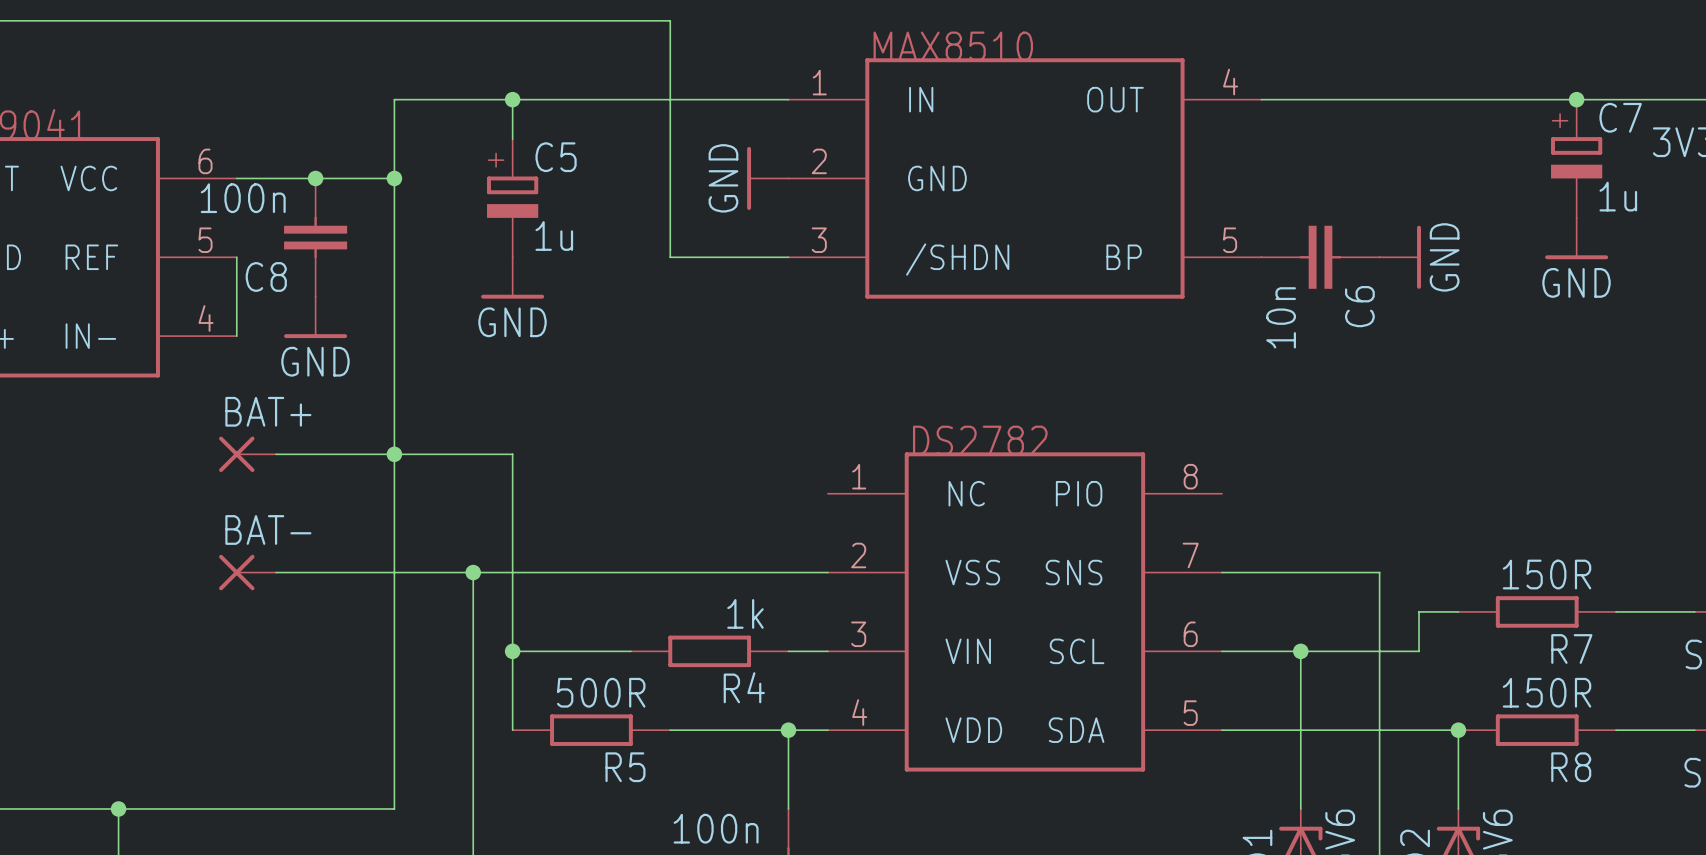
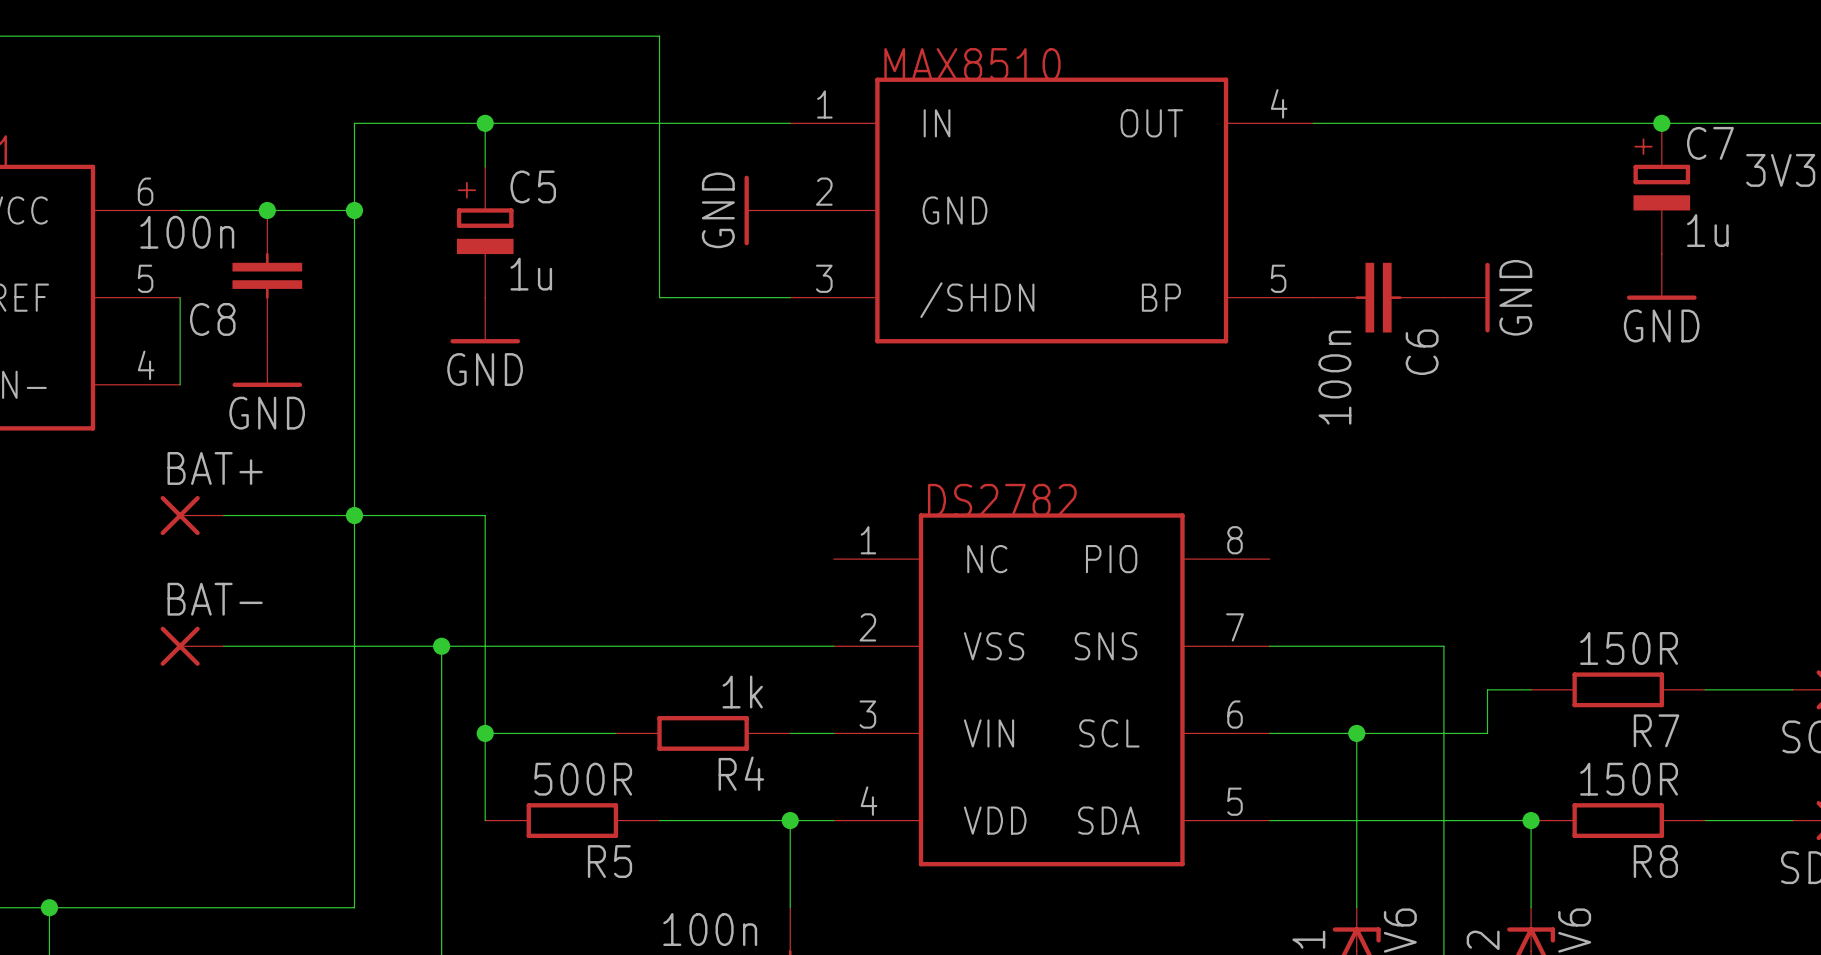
C6 value: 10n (1281, 317) -> 100n (1334, 377)

